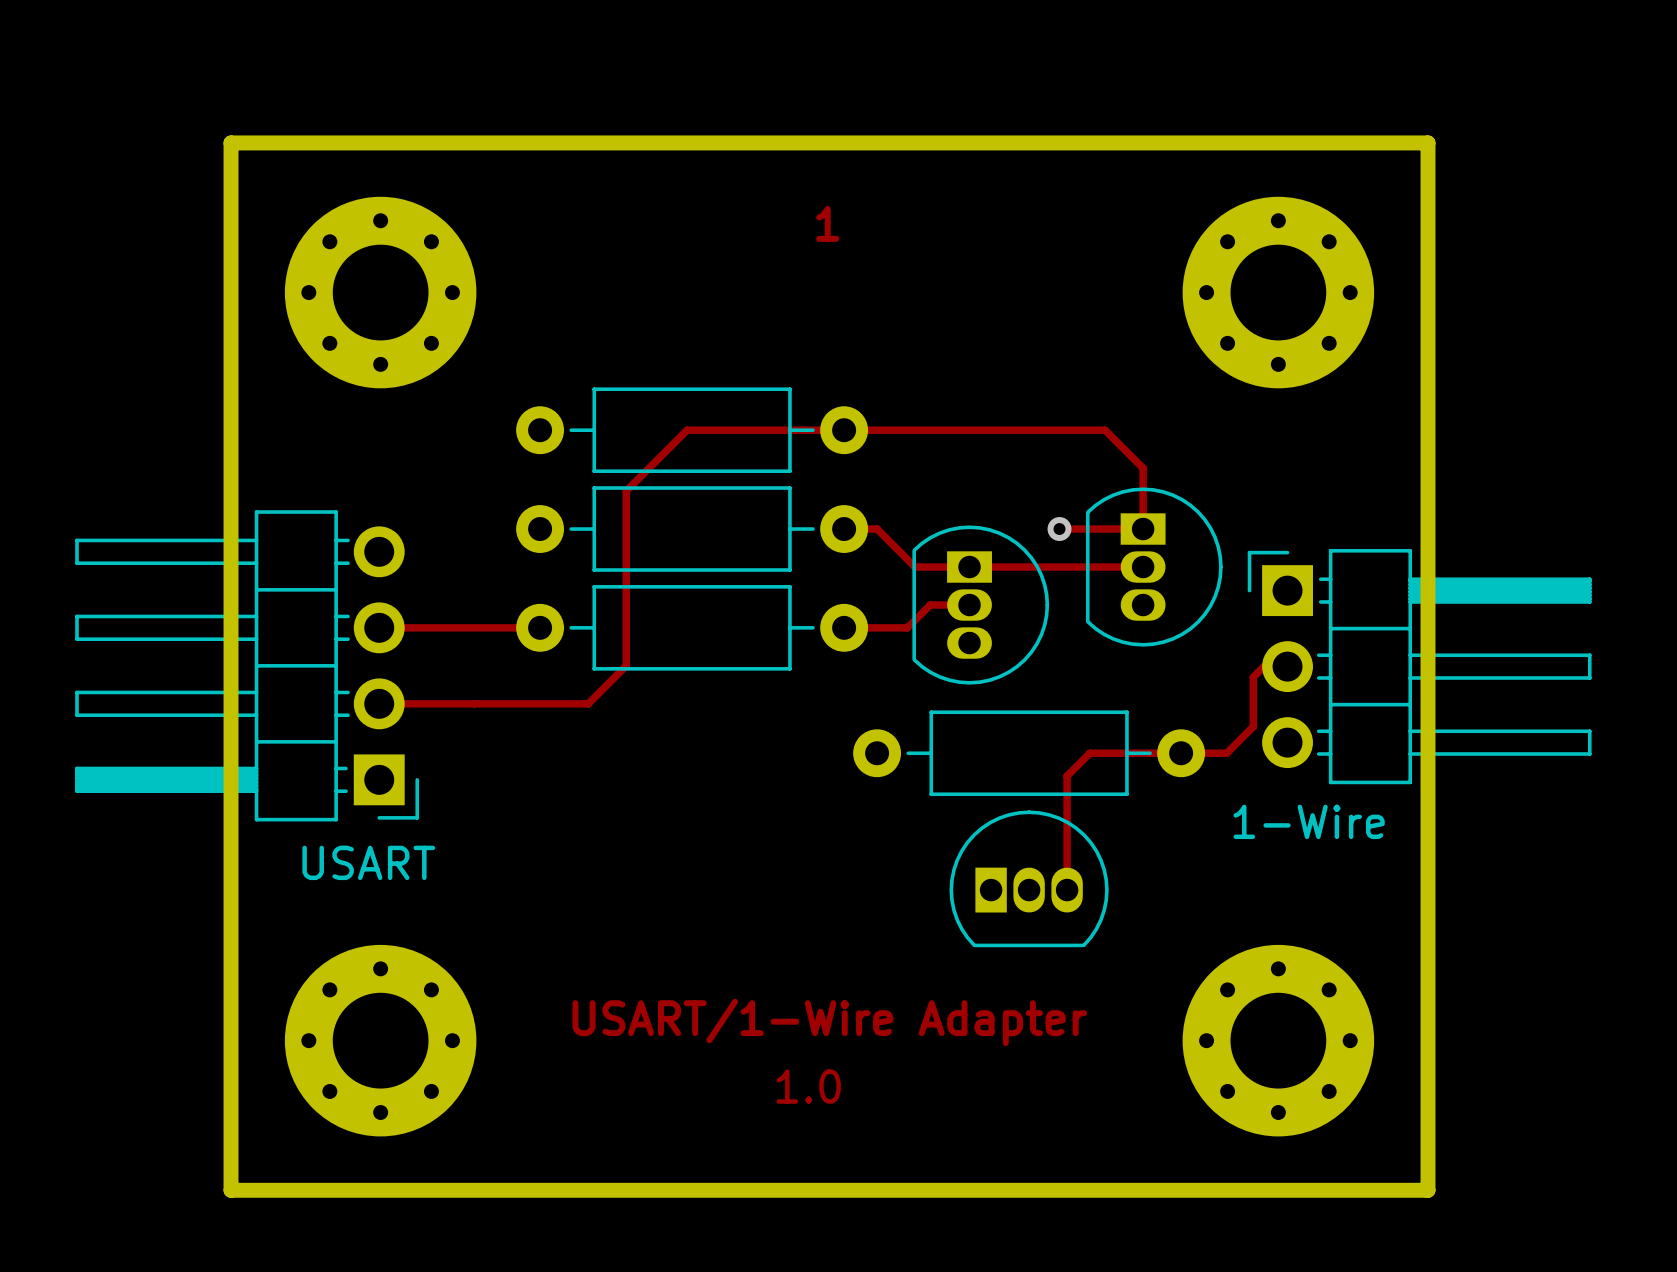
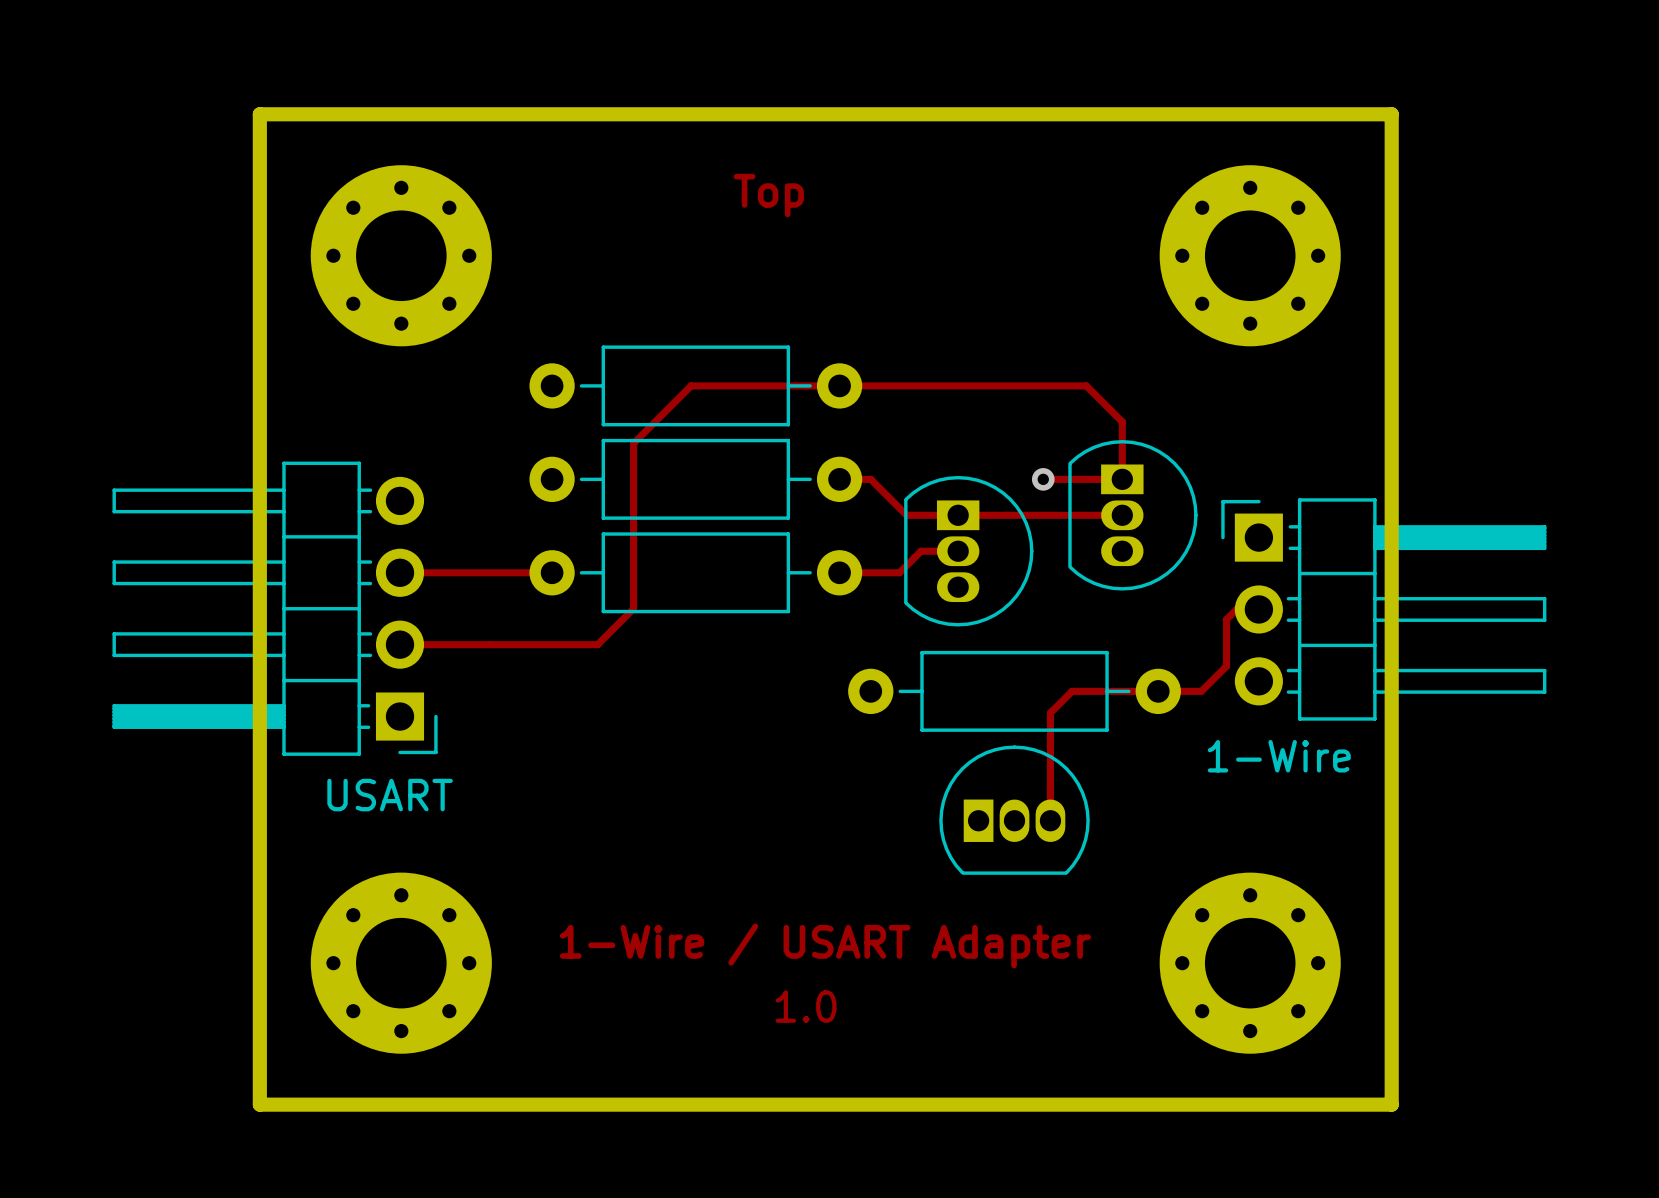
text: 1 (827, 223) -> none
text: none -> Top (768, 195)
text: USART/1-Wire Adapter (829, 1022) -> 1-Wire / USART Adapter (825, 945)

